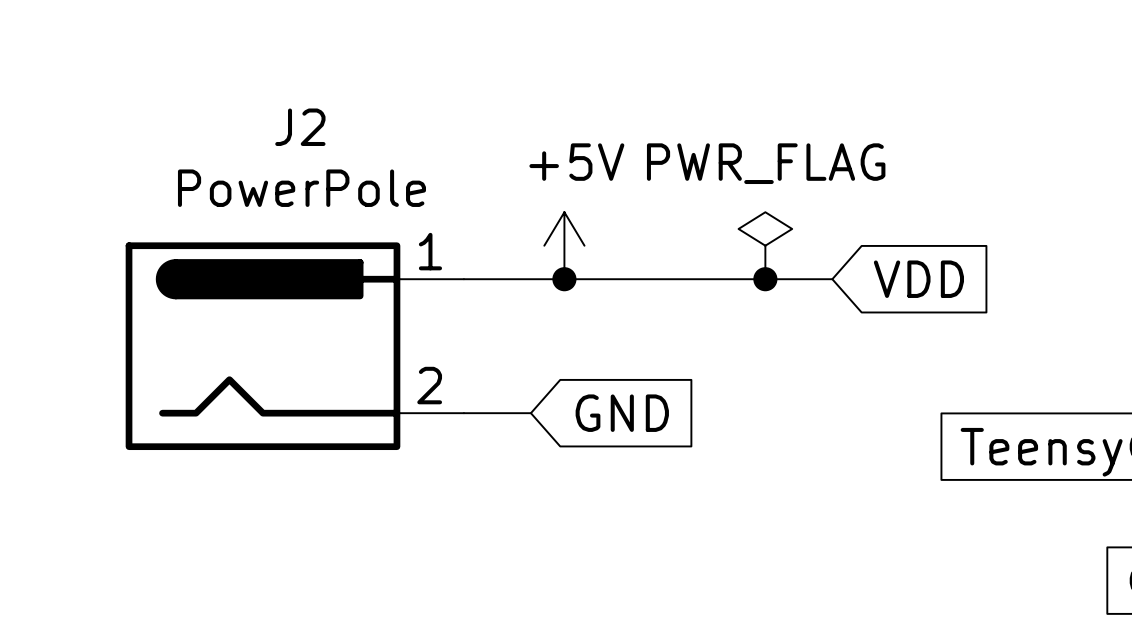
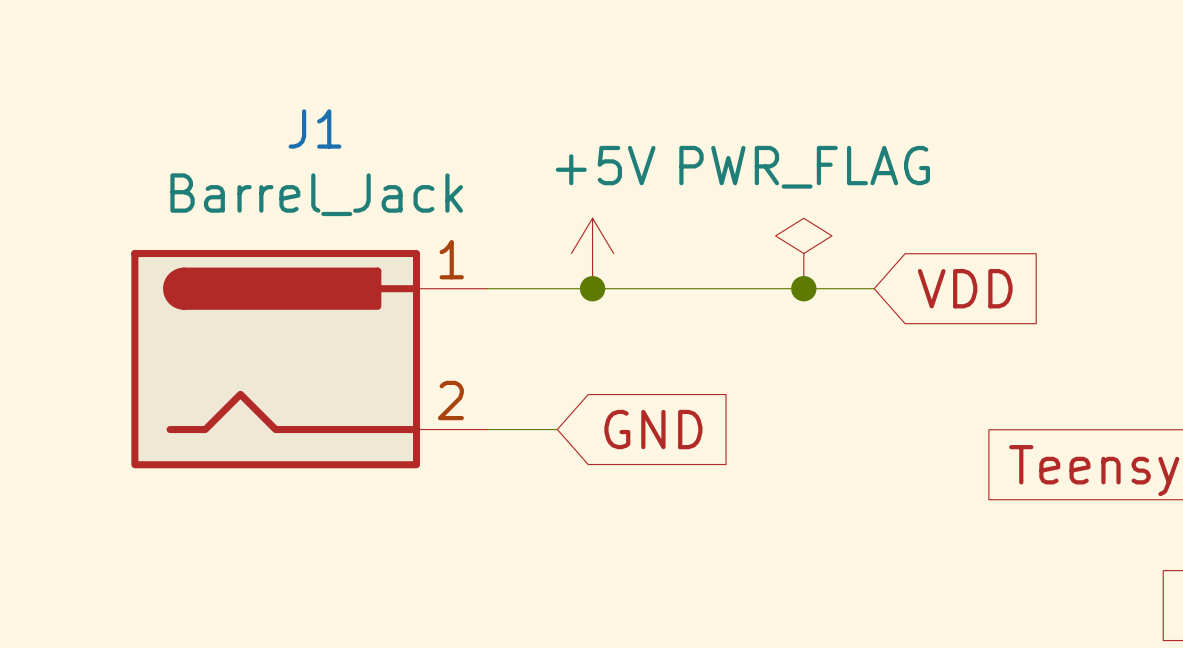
J2 name: J2 (300, 127) -> J1 (314, 128)
J2 value: PowerPole (301, 188) -> Barrel_Jack (316, 194)

